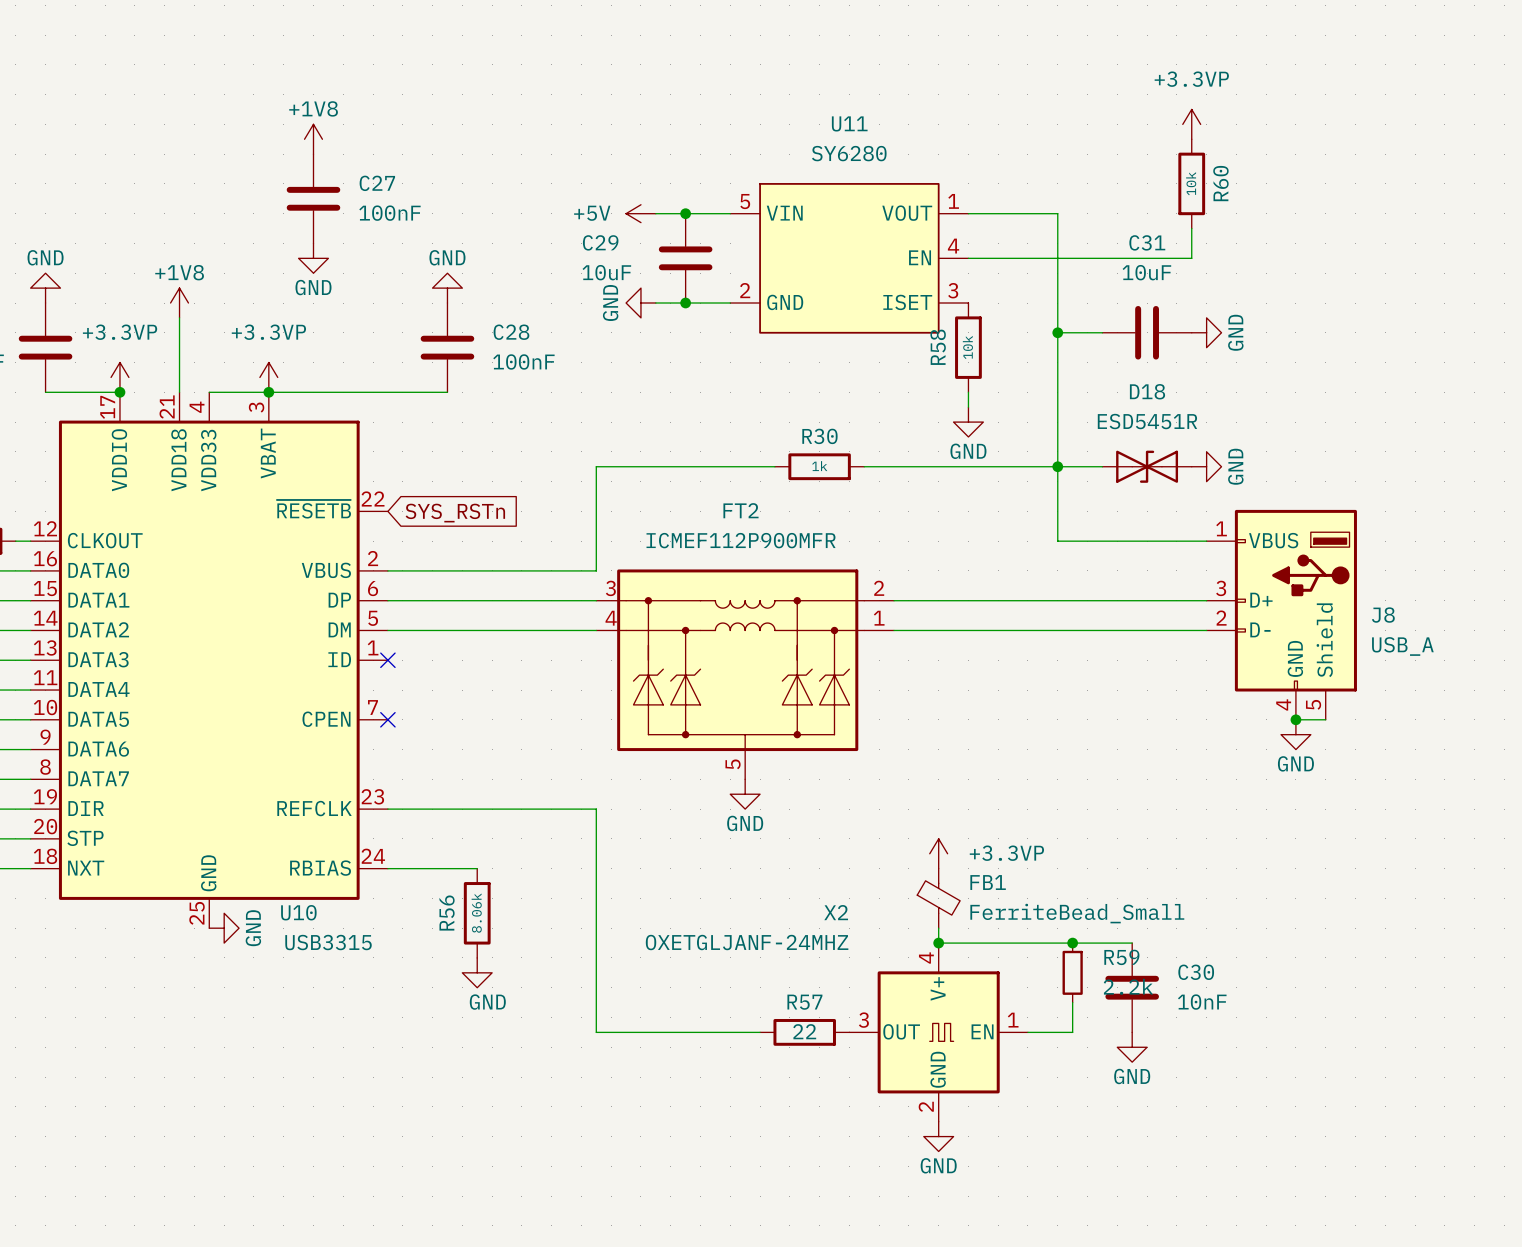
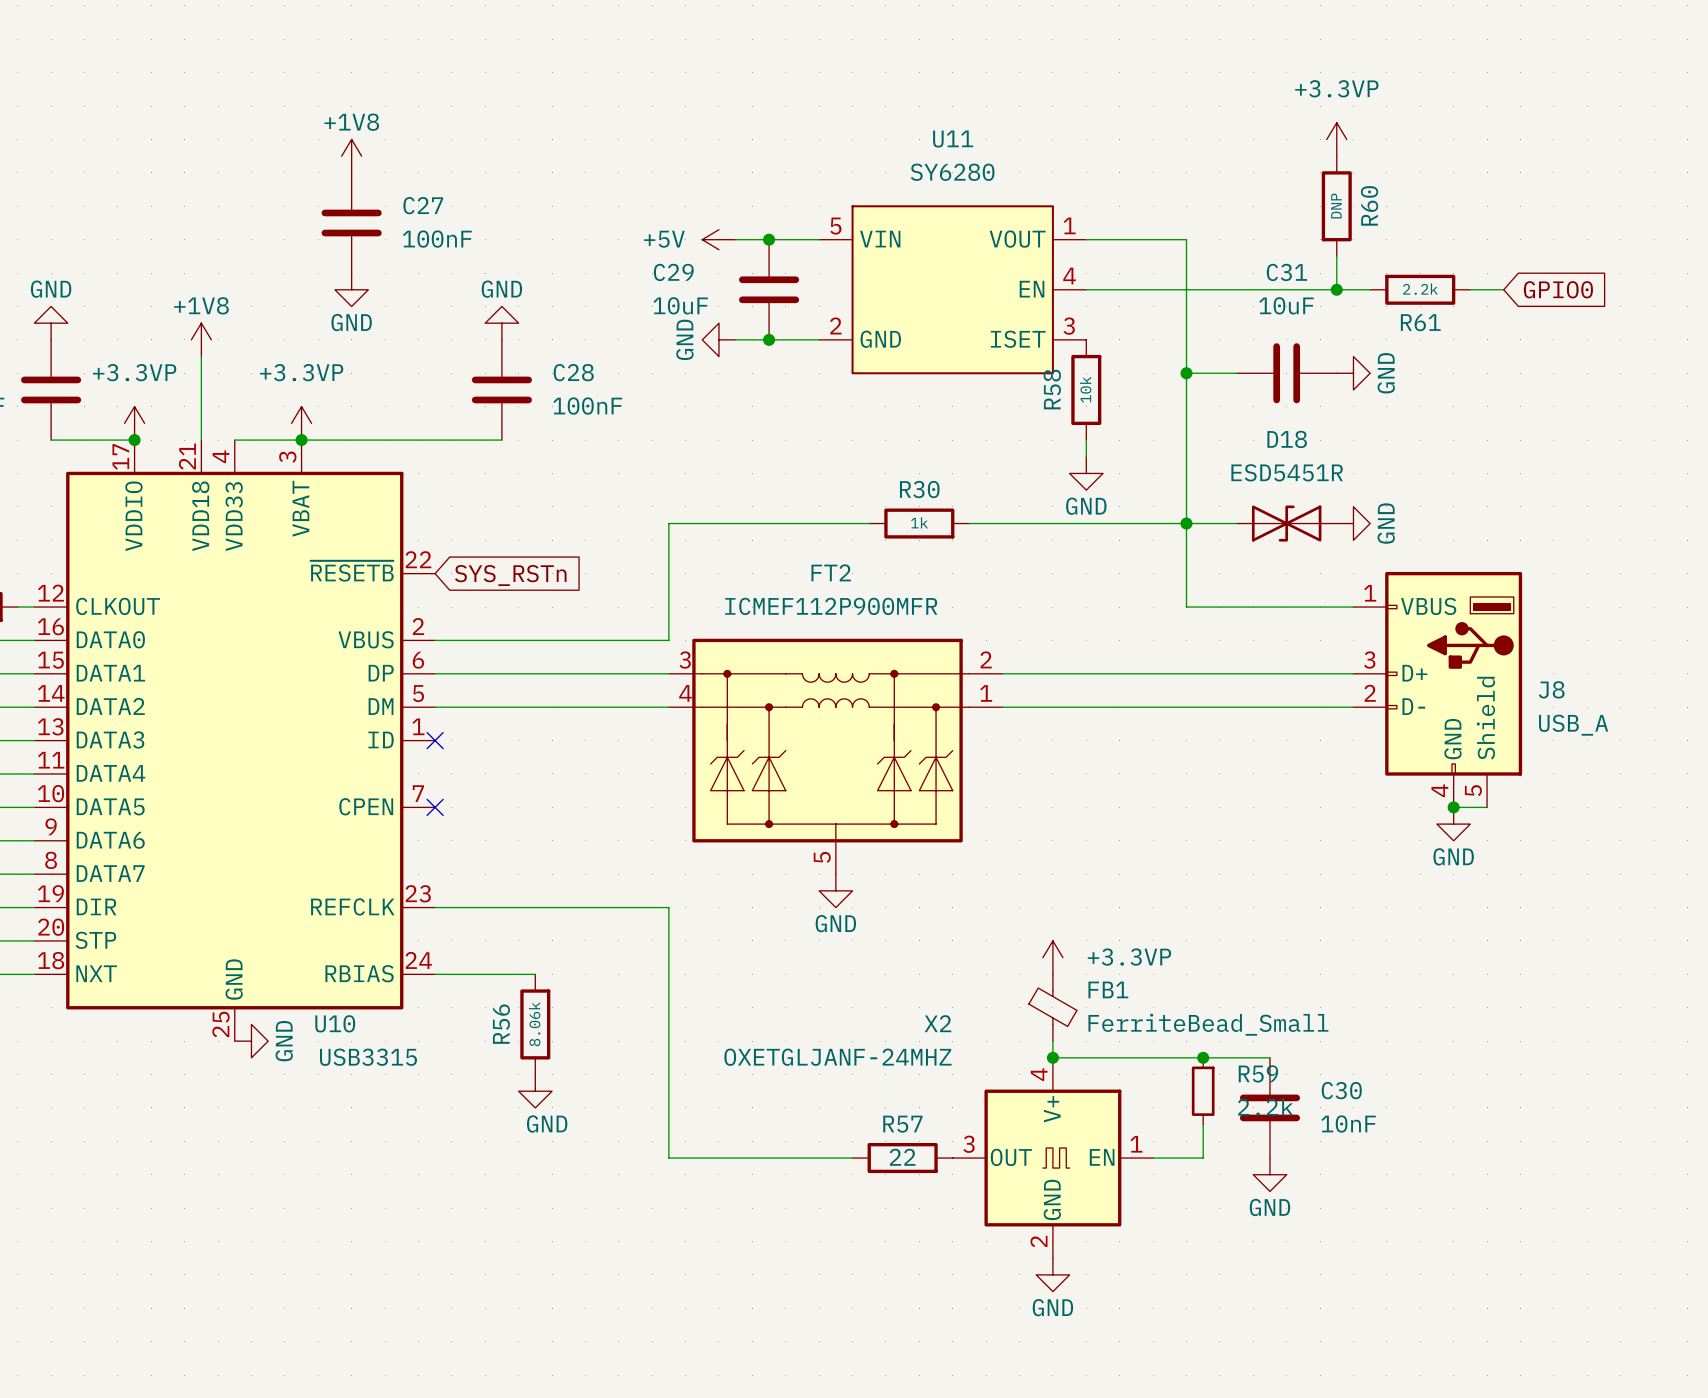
R60 value: 10k (1191, 183) -> DNP (1336, 206)
wire: none -> (1336, 289) (1370, 289)
junction: none -> (1336, 289)
R61: none -> 2.2k (1420, 289)
wire: none -> (1470, 289) (1503, 289)
global label: none -> GPIO0 (1558, 289)

